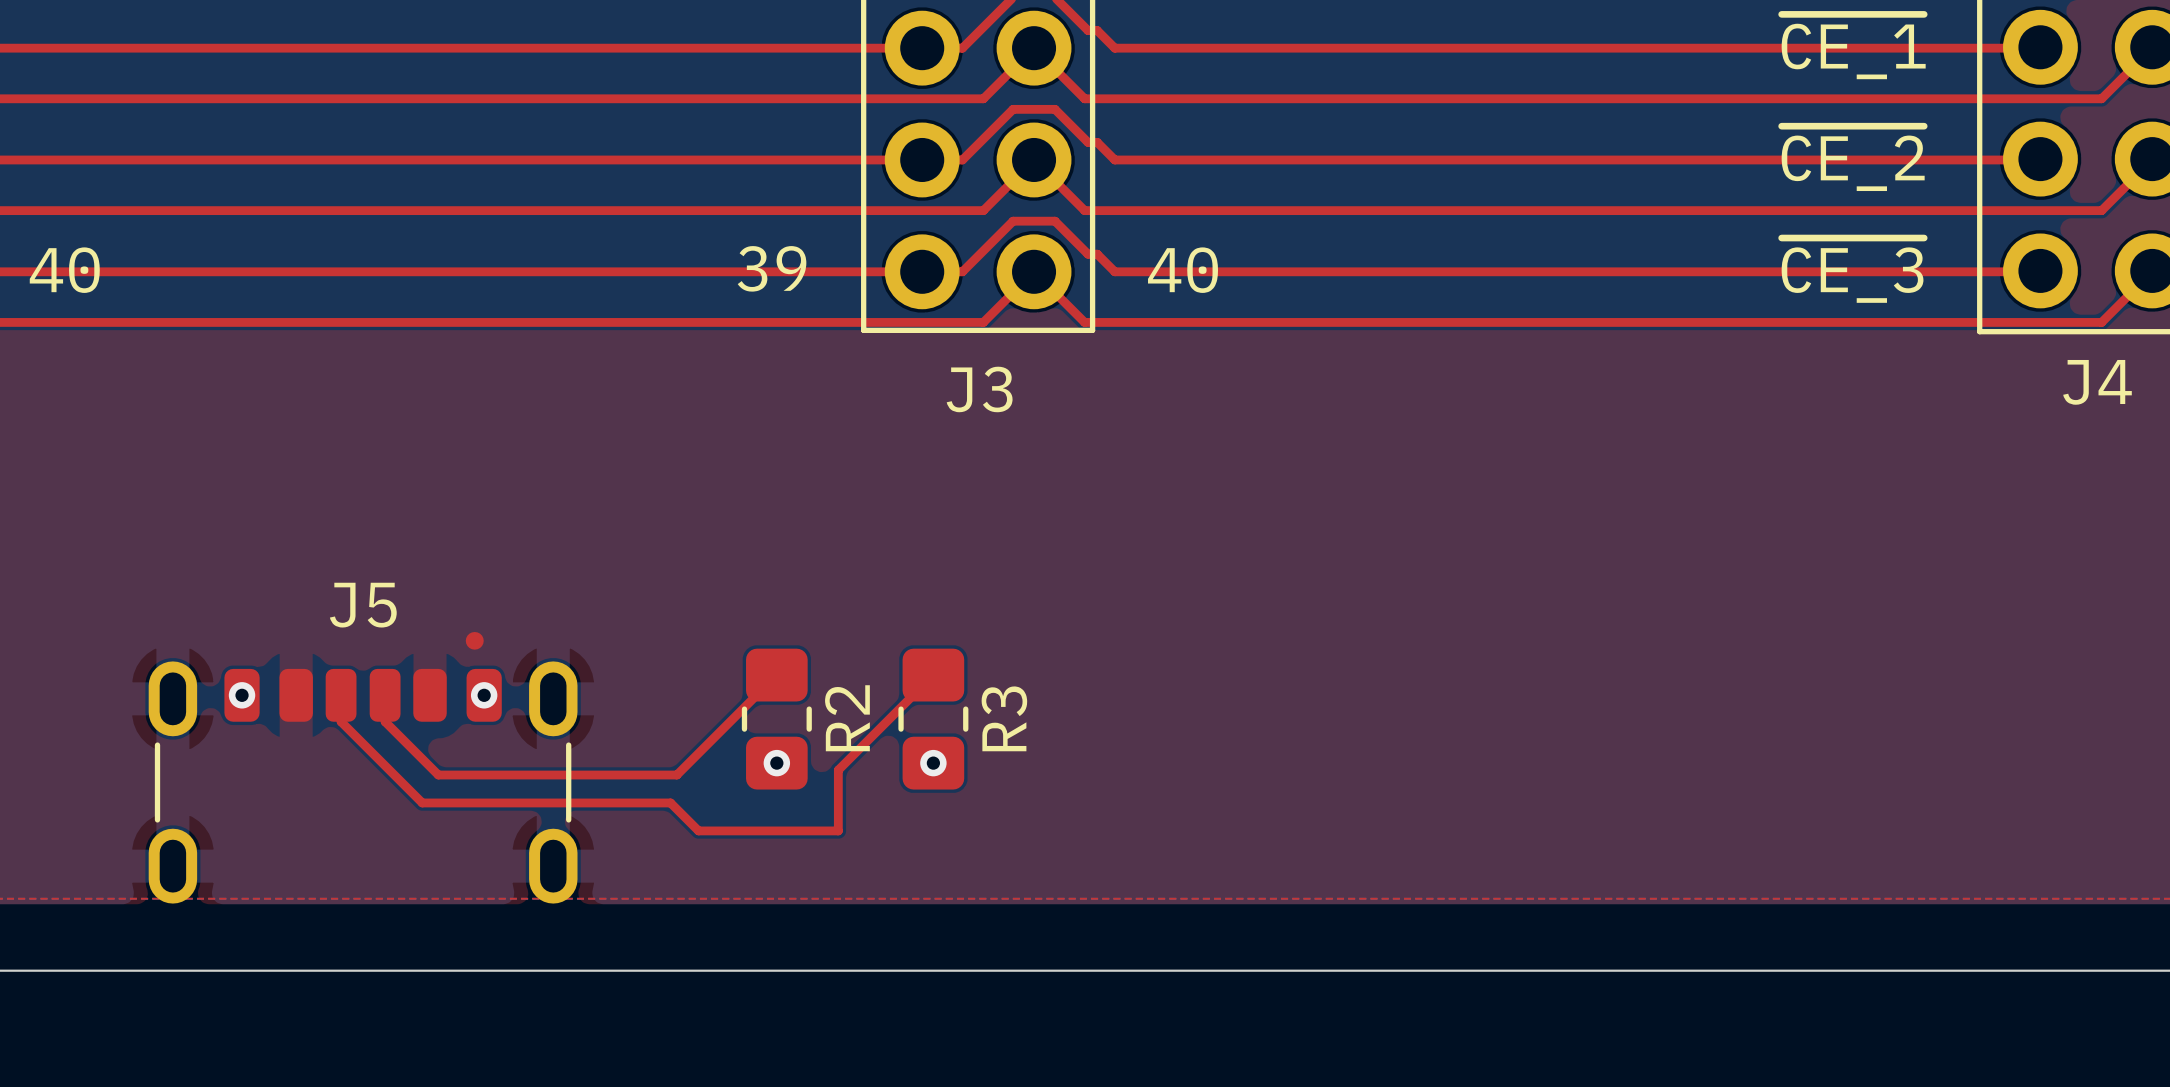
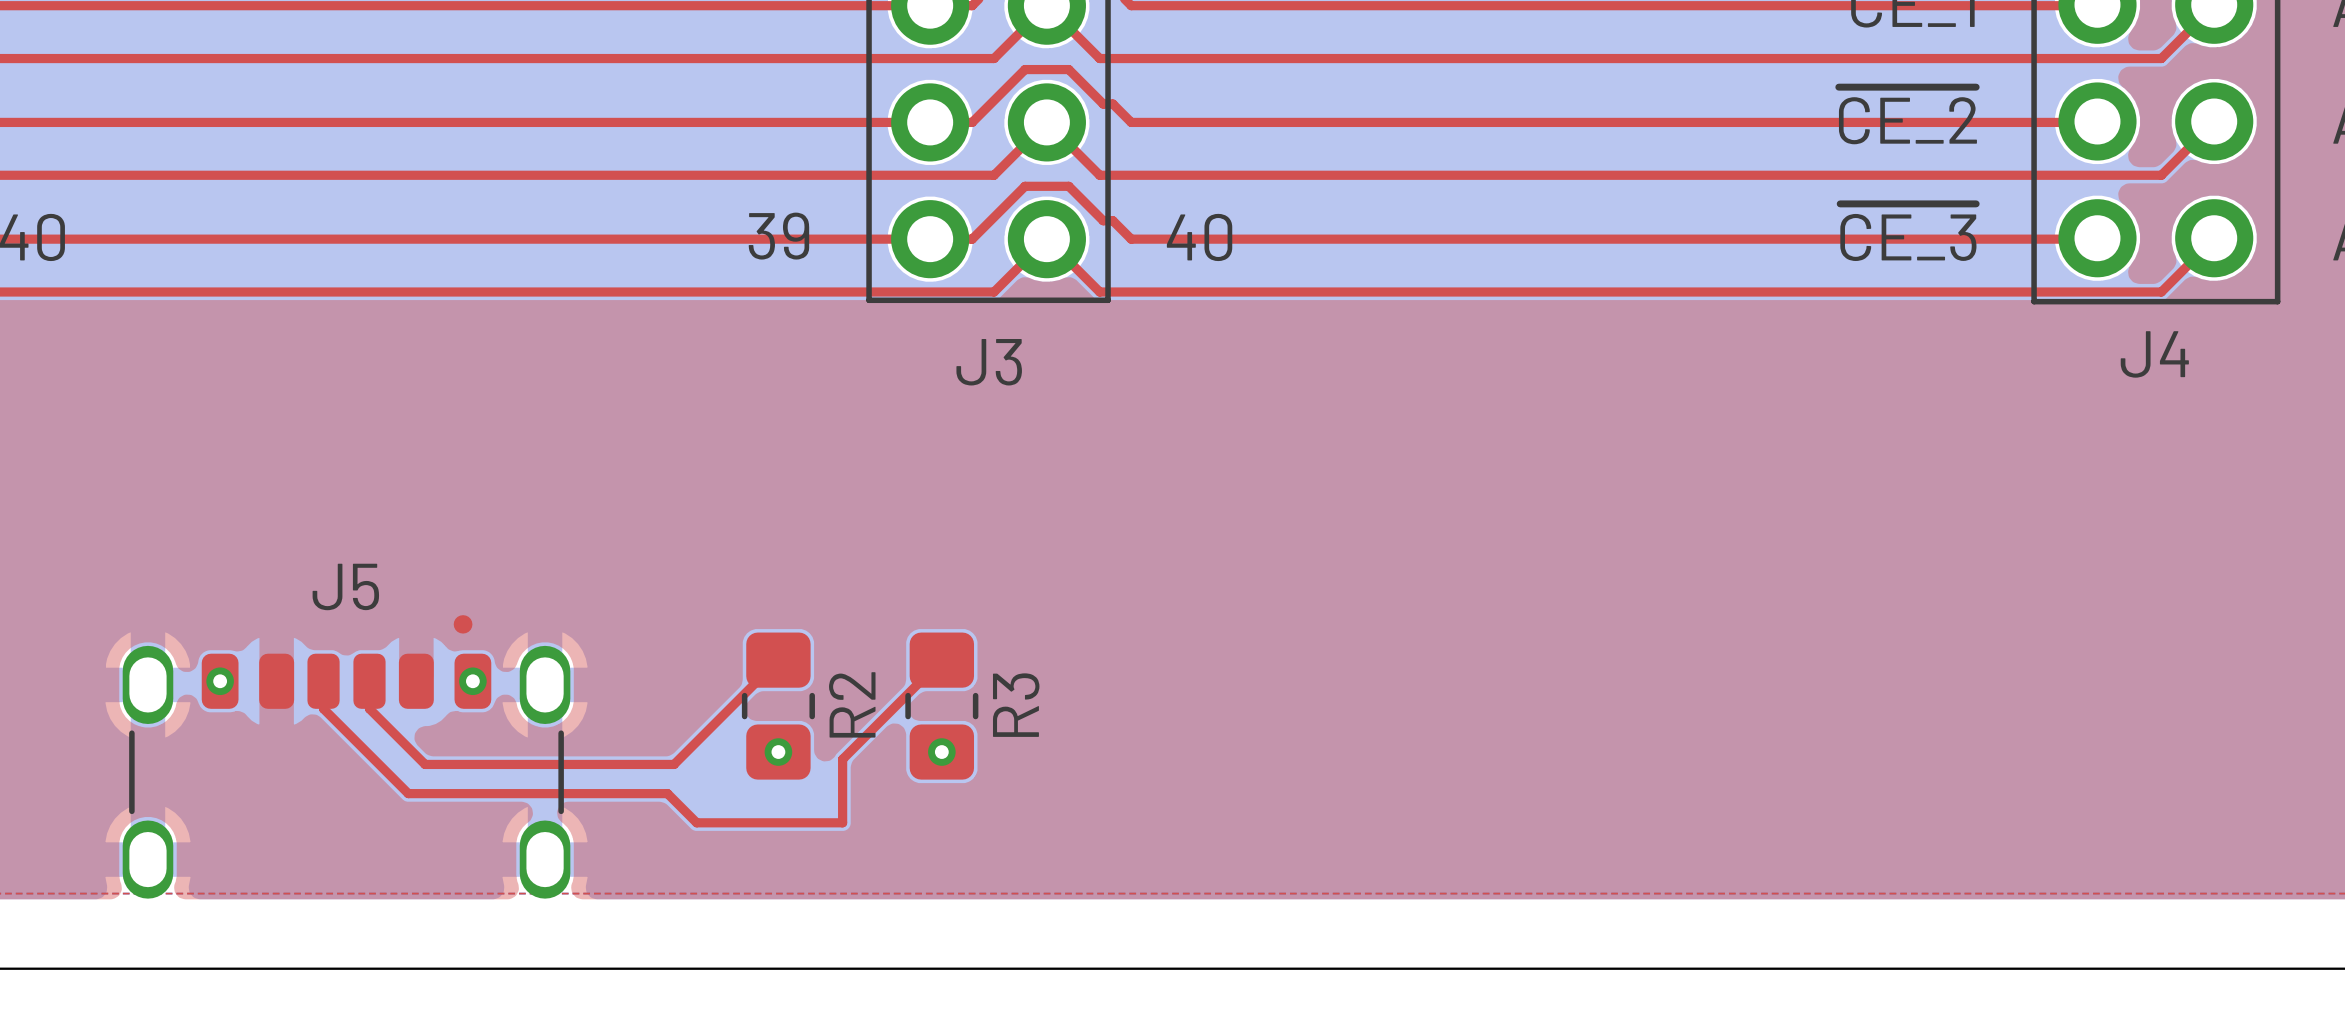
J5 footprint: [148, 661, 578, 904] -> [122, 645, 571, 899]

